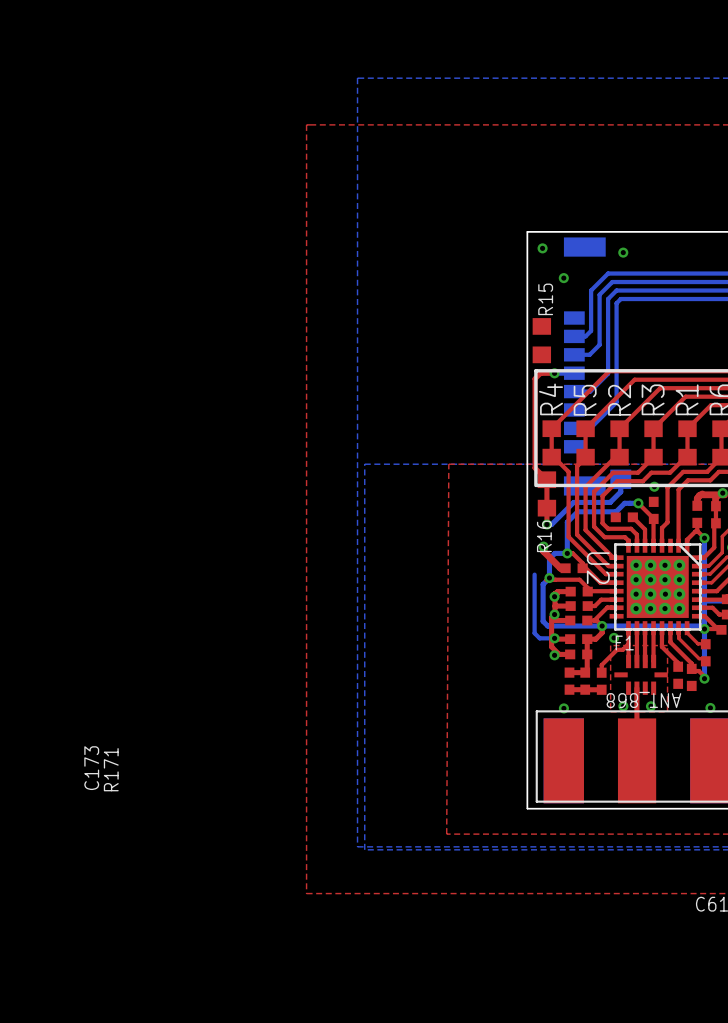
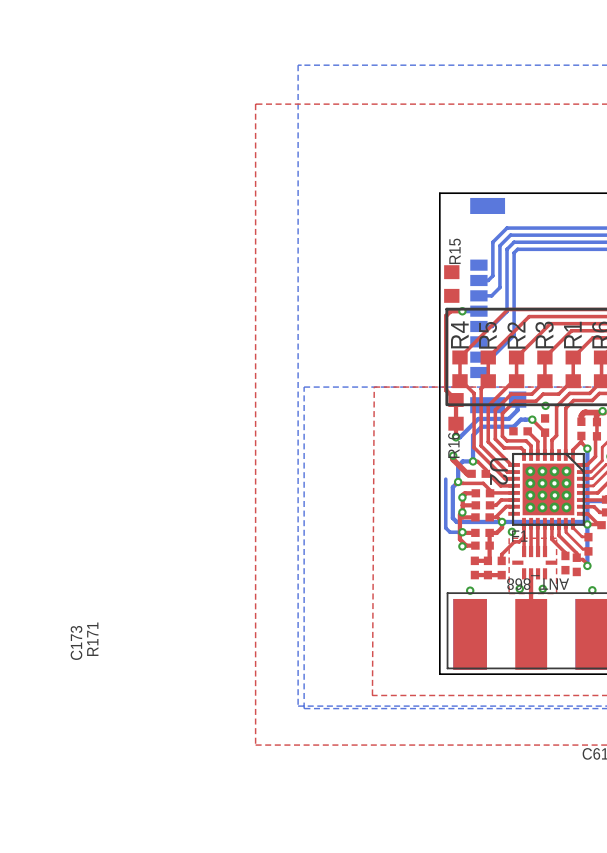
via: (542, 248) -> none
via: (623, 252) -> none
via: (563, 278) -> none

